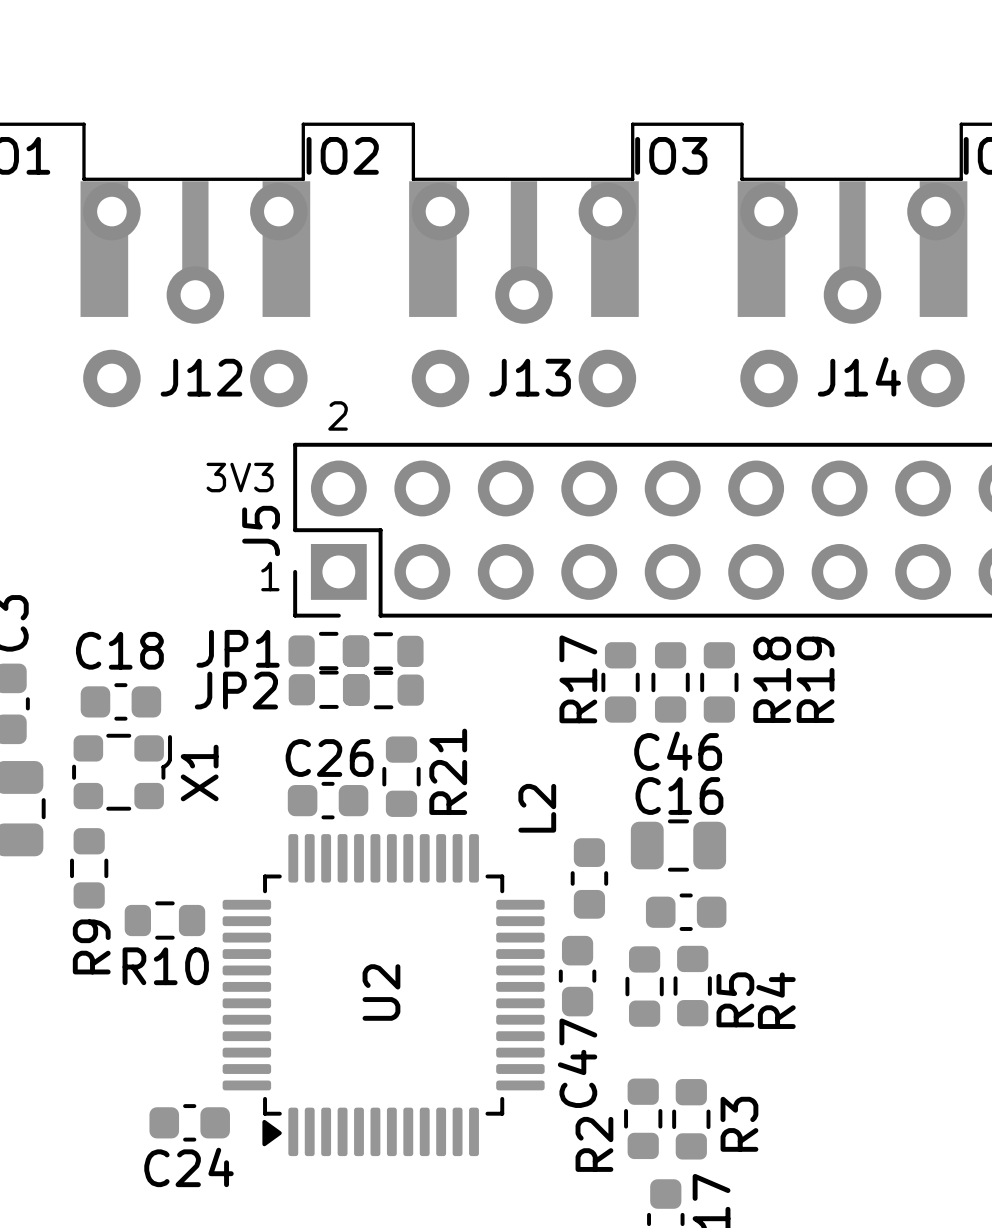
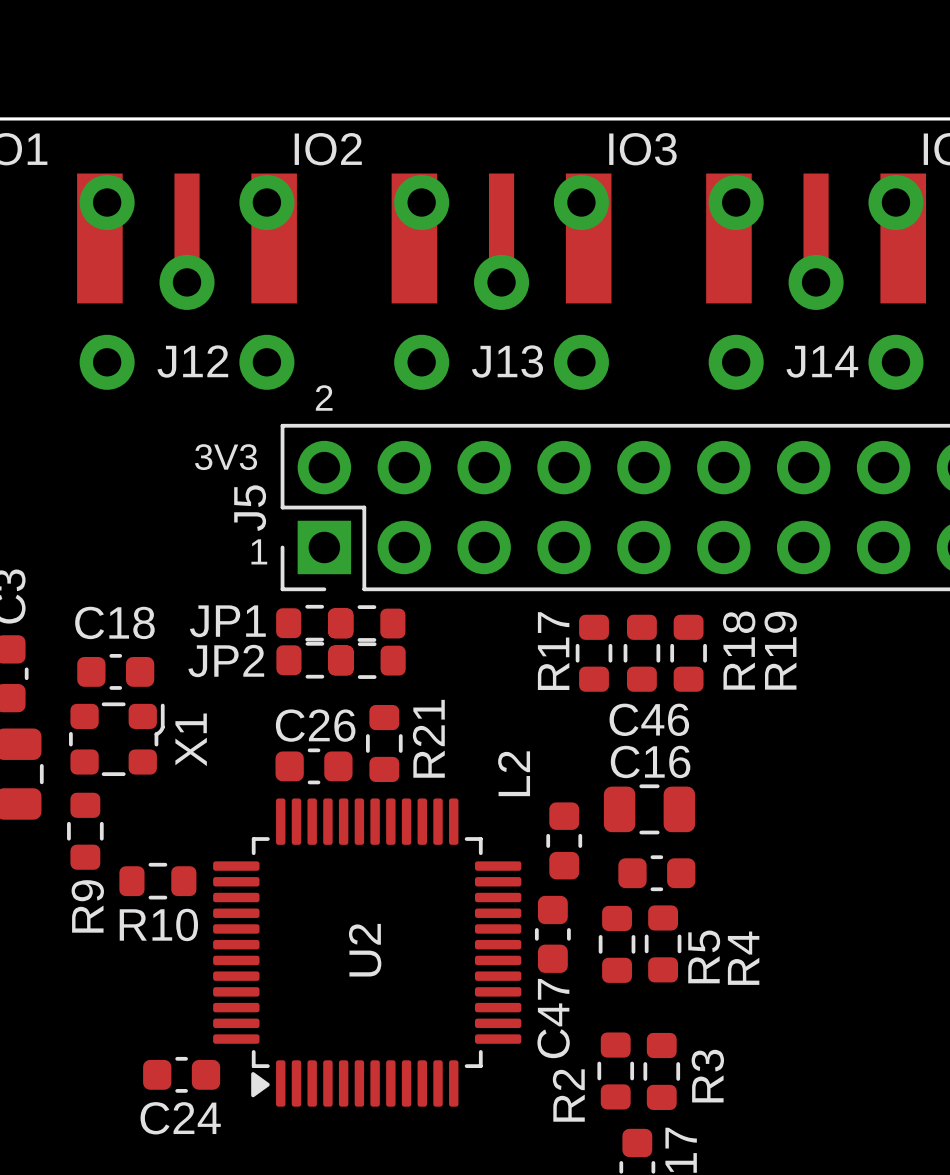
board edge: (83, 124) (83, 179) (303, 179) (303, 124) -> (80, 118) (290, 118)
board edge: (413, 124) (413, 179) (632, 179) (632, 124) -> (395, 118) (605, 118)
board edge: (741, 124) (741, 179) (961, 179) (961, 124) -> (710, 118) (920, 118)

